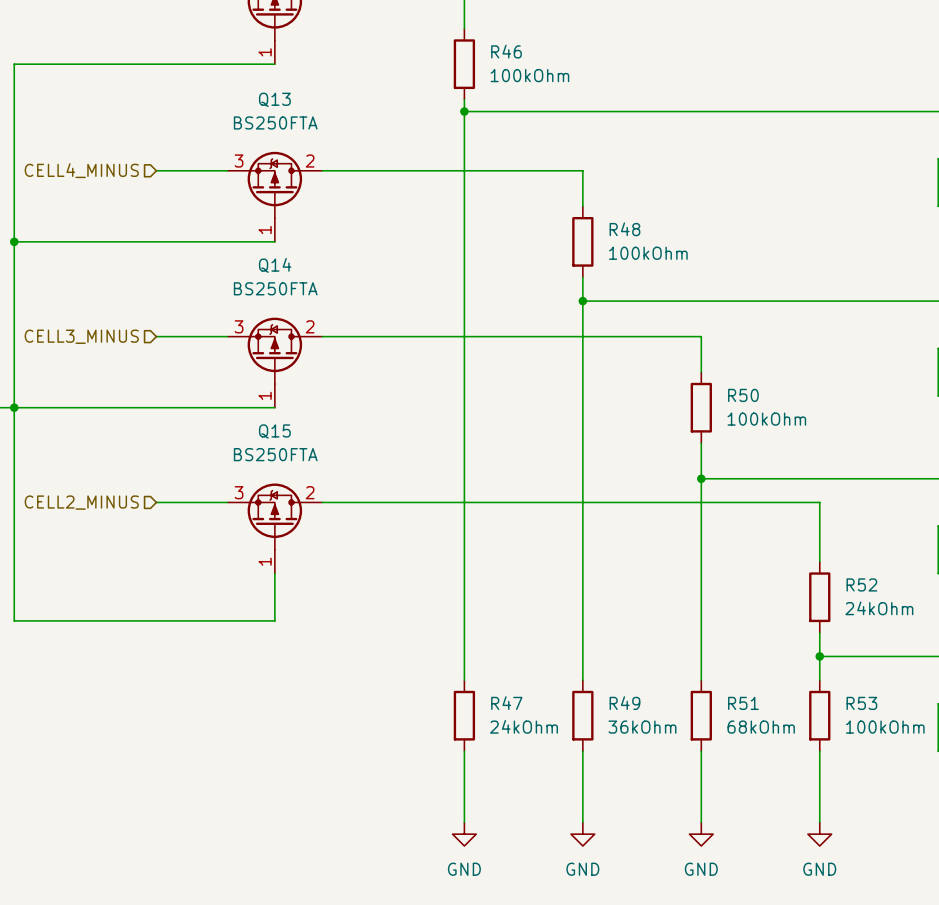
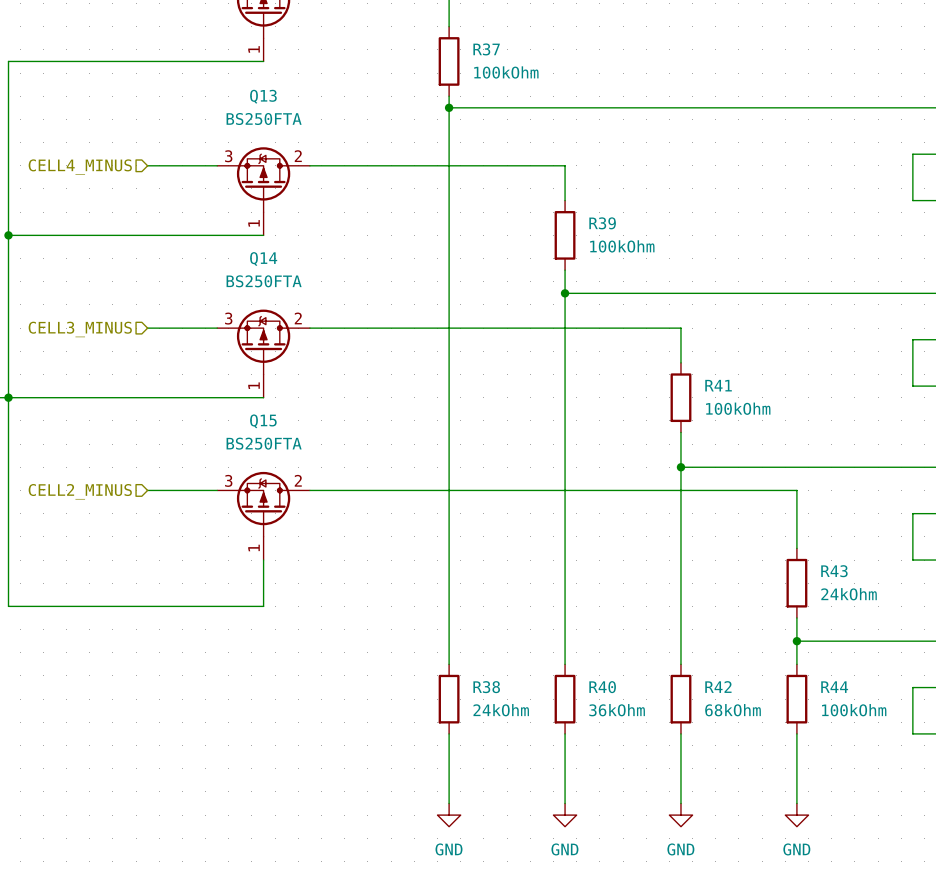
R46 name: R46 (506, 51) -> R37 (486, 49)
R48 name: R48 (624, 229) -> R39 (602, 223)
R50 name: R50 (743, 395) -> R41 (718, 385)
R52 name: R52 (861, 584) -> R43 (834, 571)
R47 name: R47 (506, 703) -> R38 (486, 687)
R49 name: R49 (624, 703) -> R40 (602, 687)
R51 name: R51 (743, 703) -> R42 (718, 687)
R53 name: R53 (861, 703) -> R44 (834, 687)

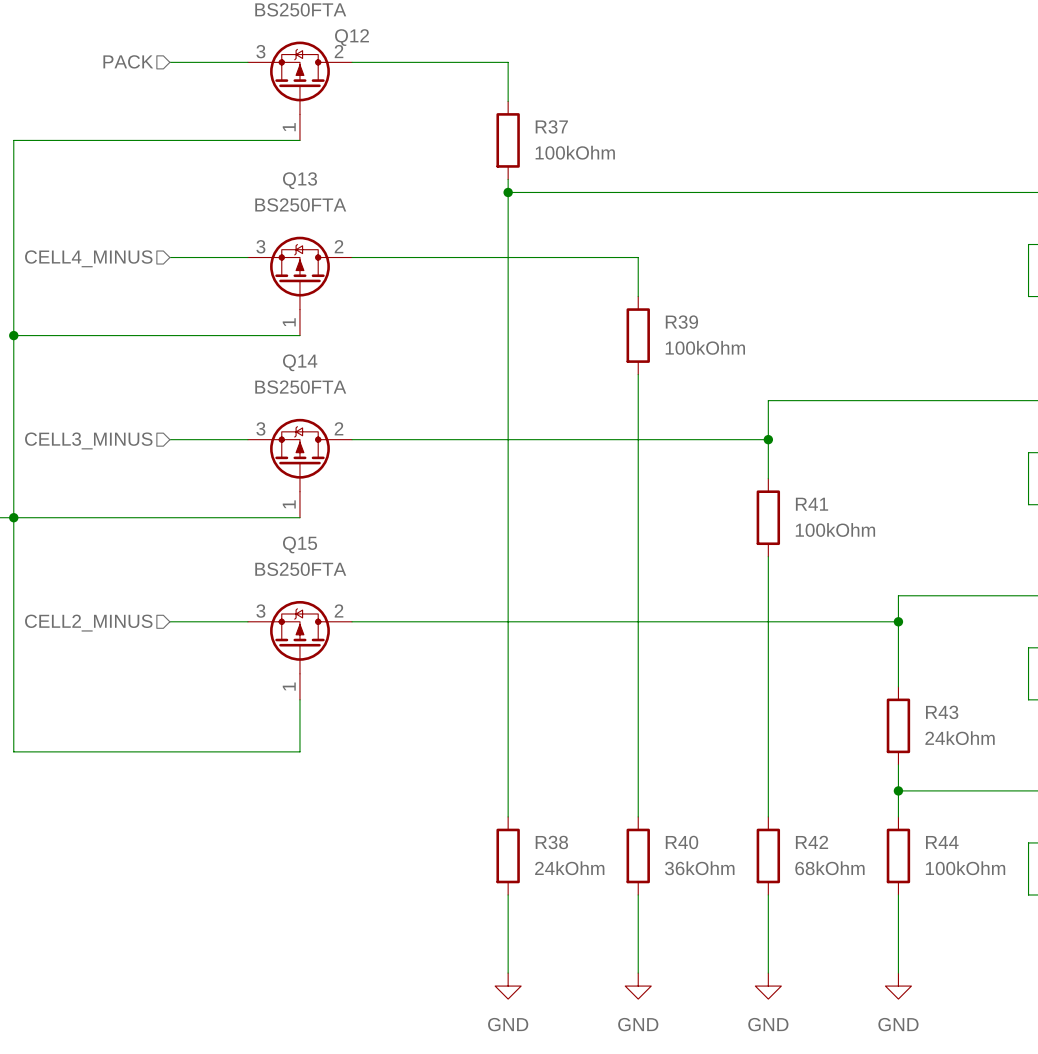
wire: (565, 293) (680, 293) -> (768, 439) (768, 400)
junction: (565, 293) -> none
junction: none -> (768, 439)
wire: (680, 467) (796, 467) -> (898, 621) (898, 595)
junction: (680, 467) -> none
junction: none -> (898, 621)

